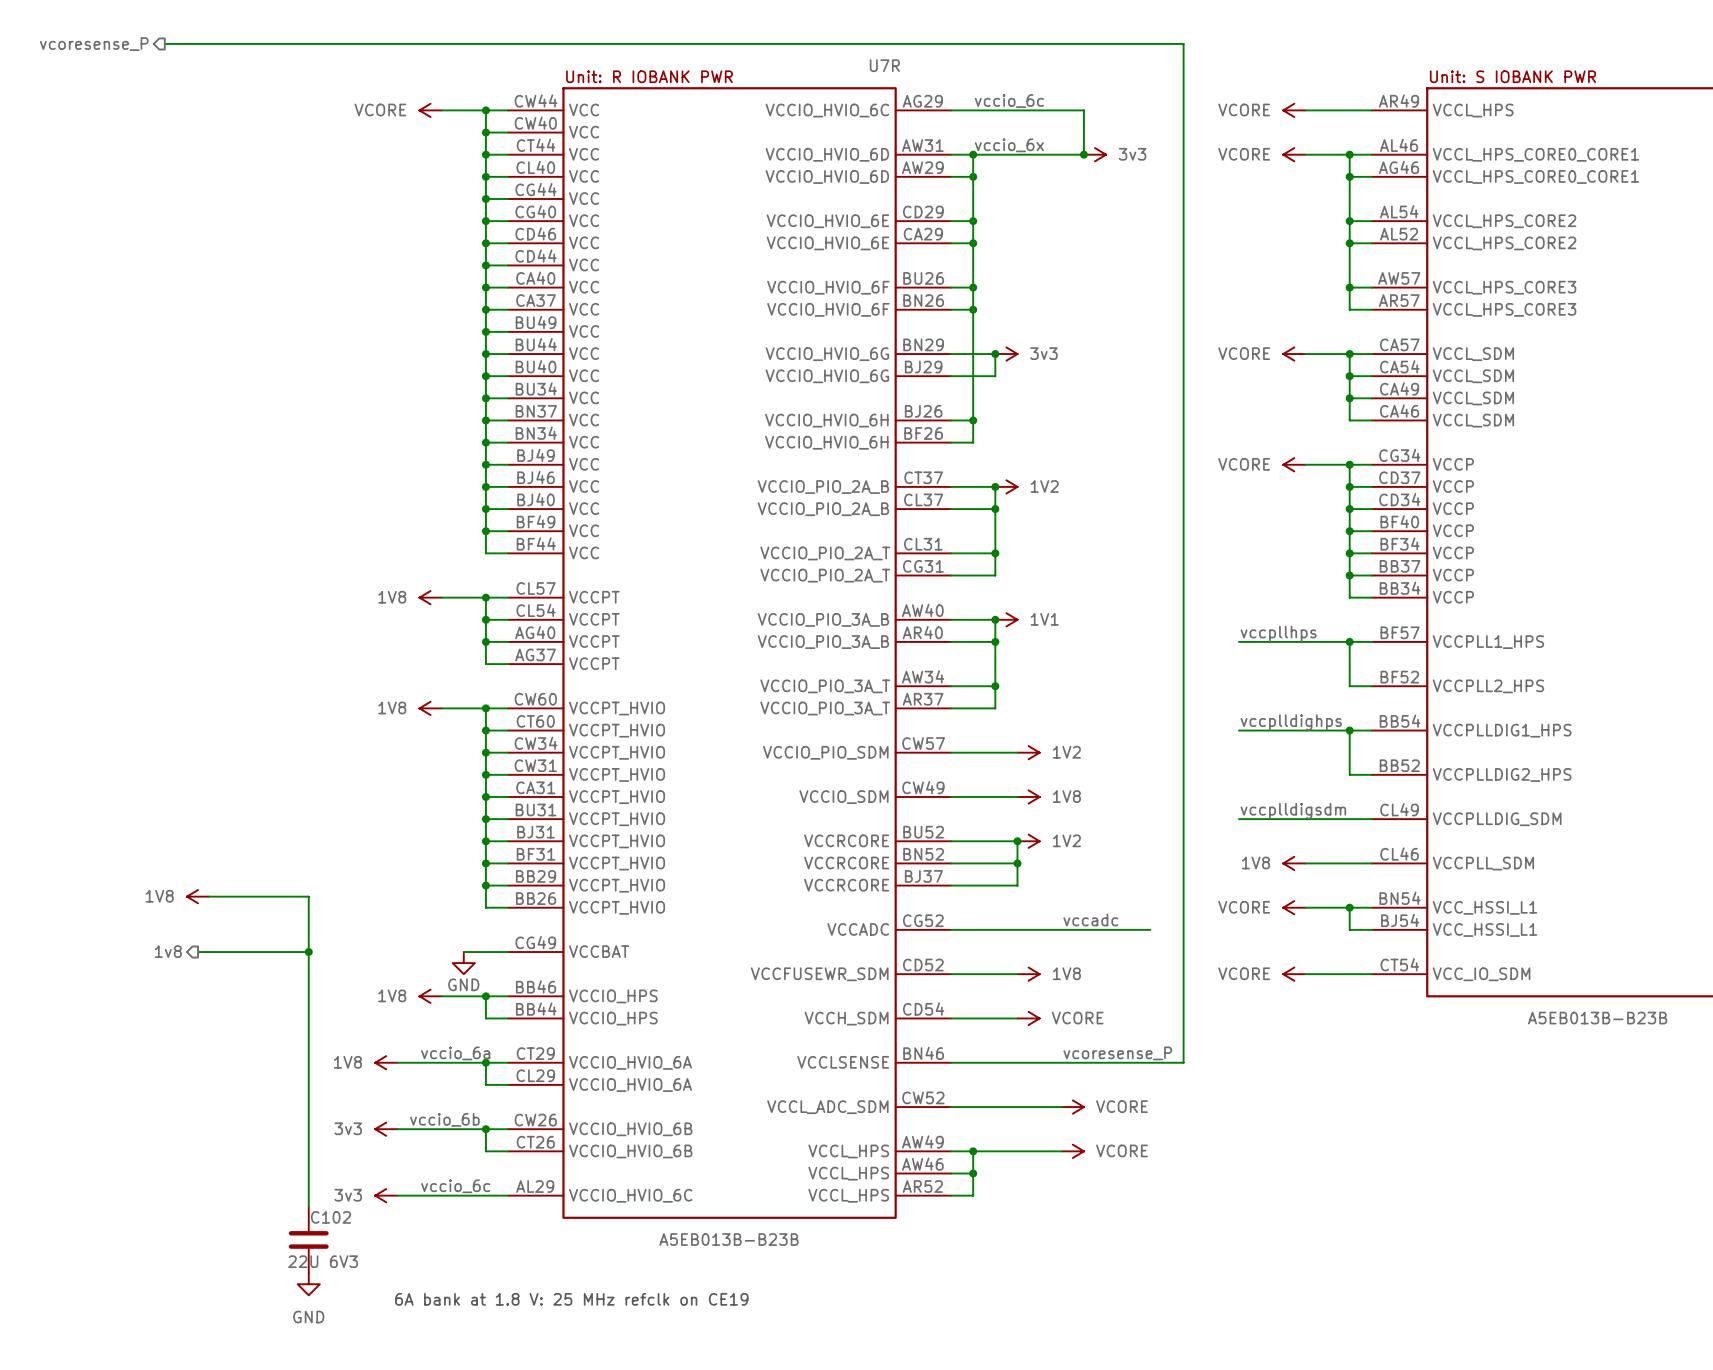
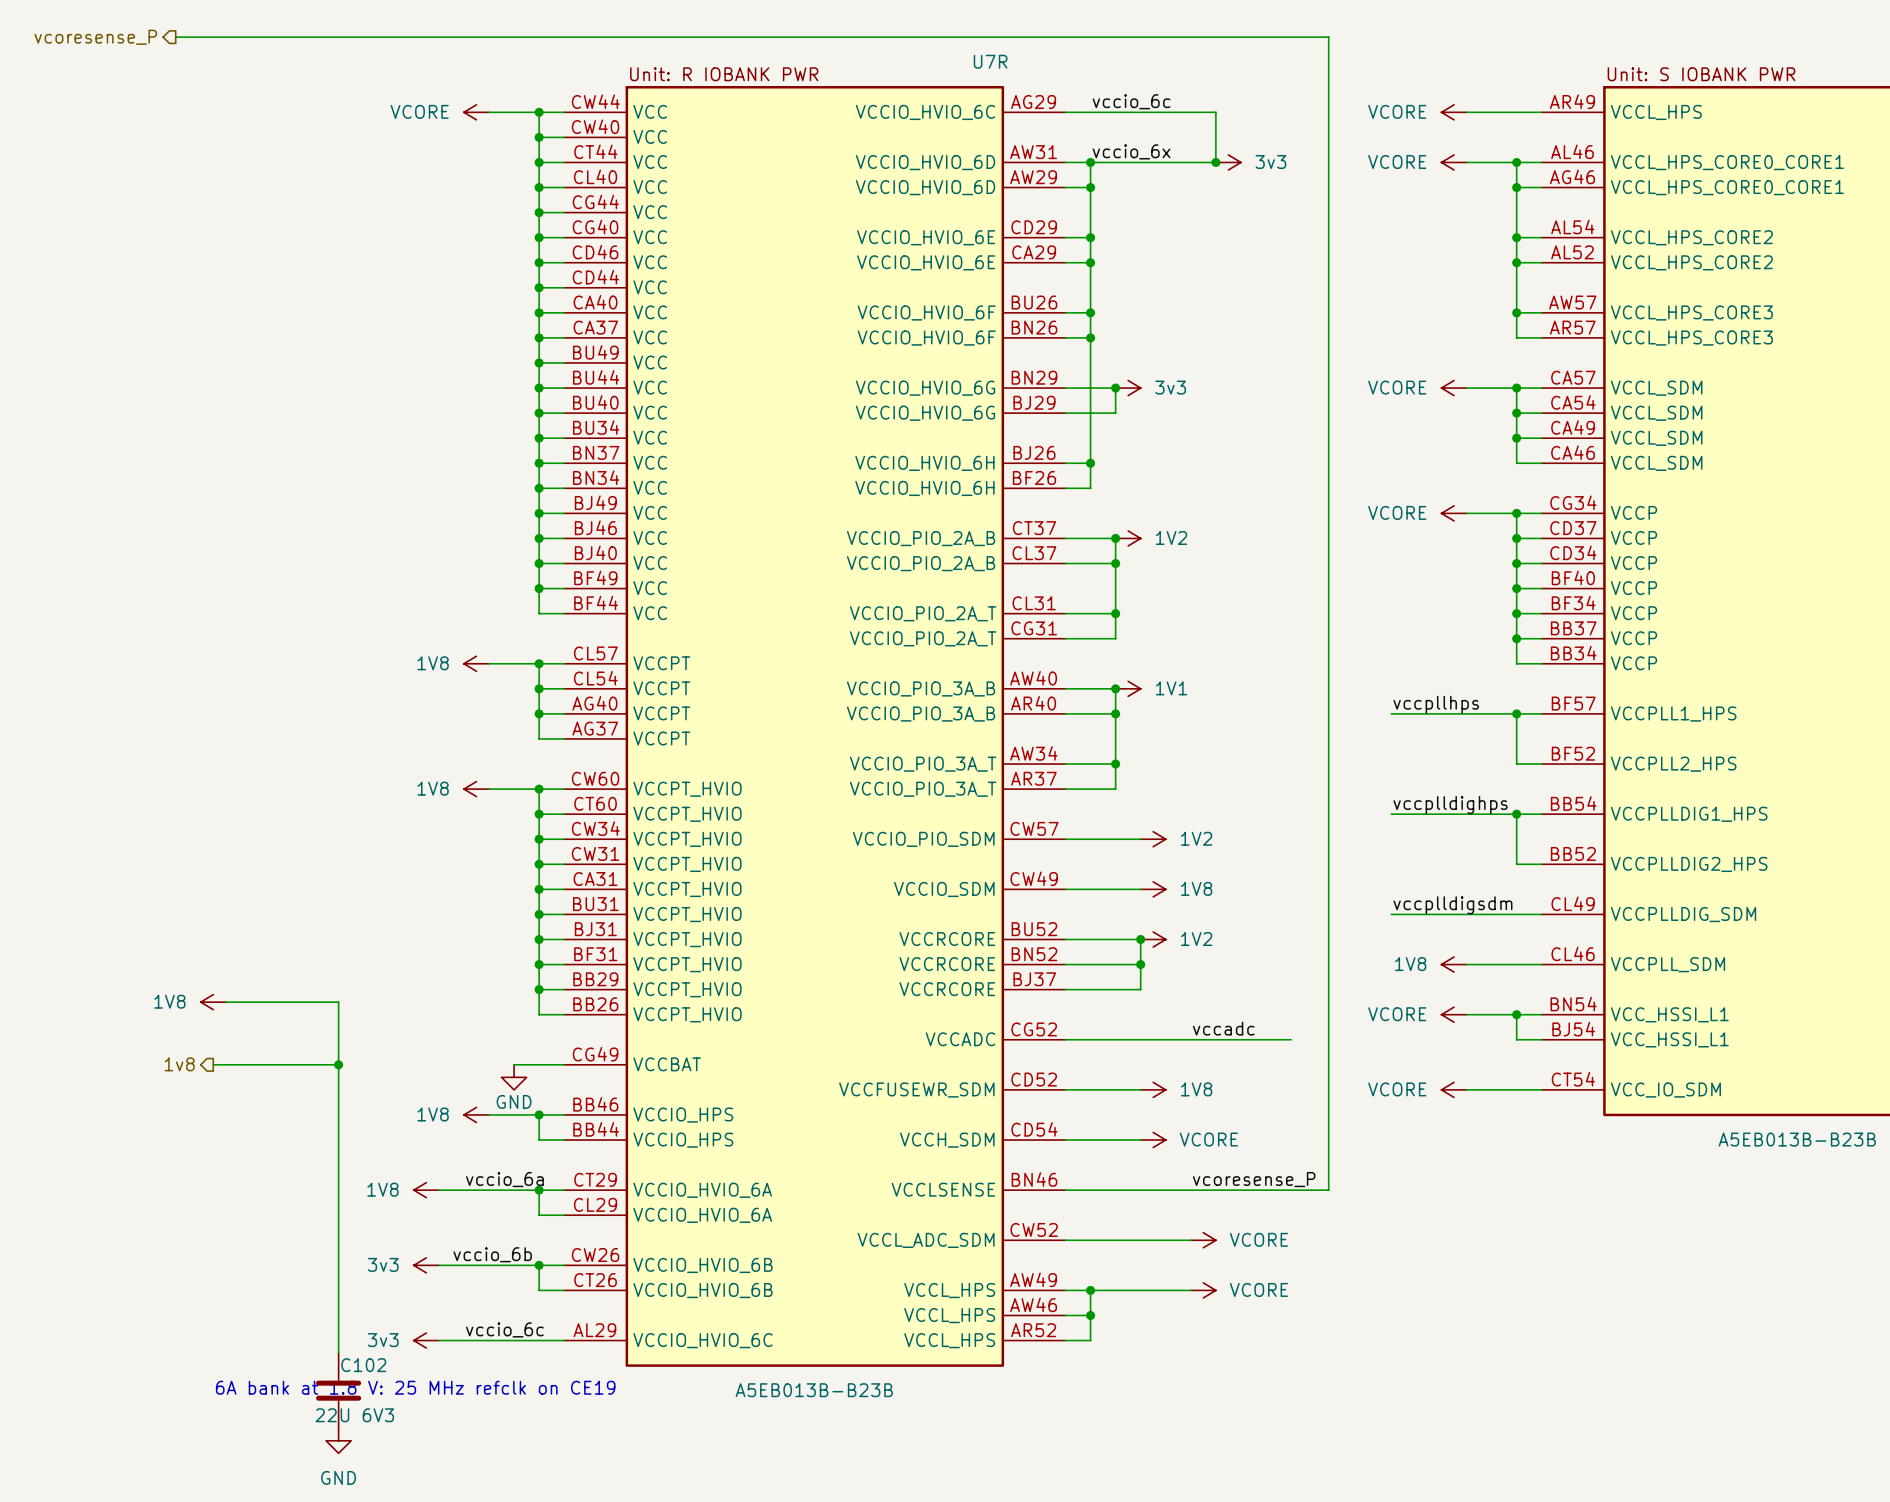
text position: 6A bank at 1.8 V: 25 MHz refclk on CE19 (571, 1299) -> 6A bank at 1.8 V: 25 MHz refclk on CE19 (415, 1387)

